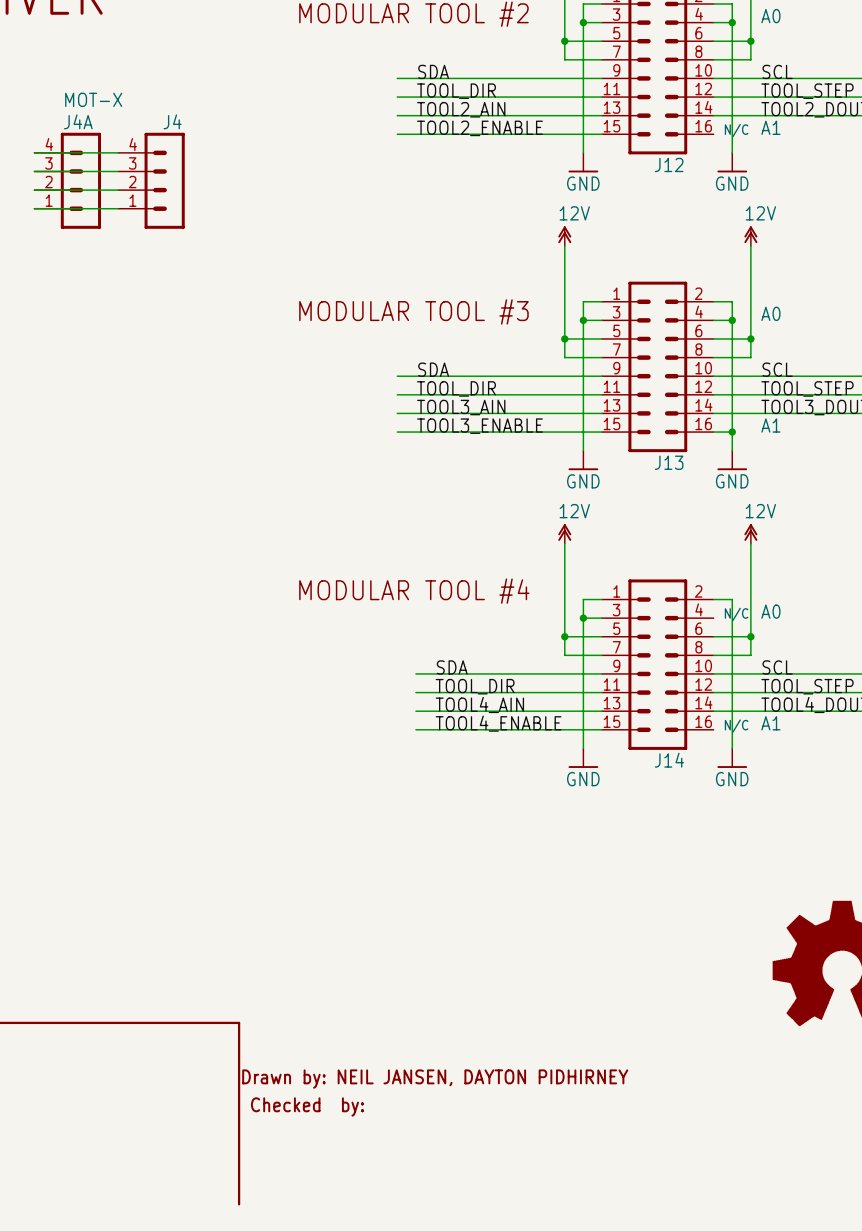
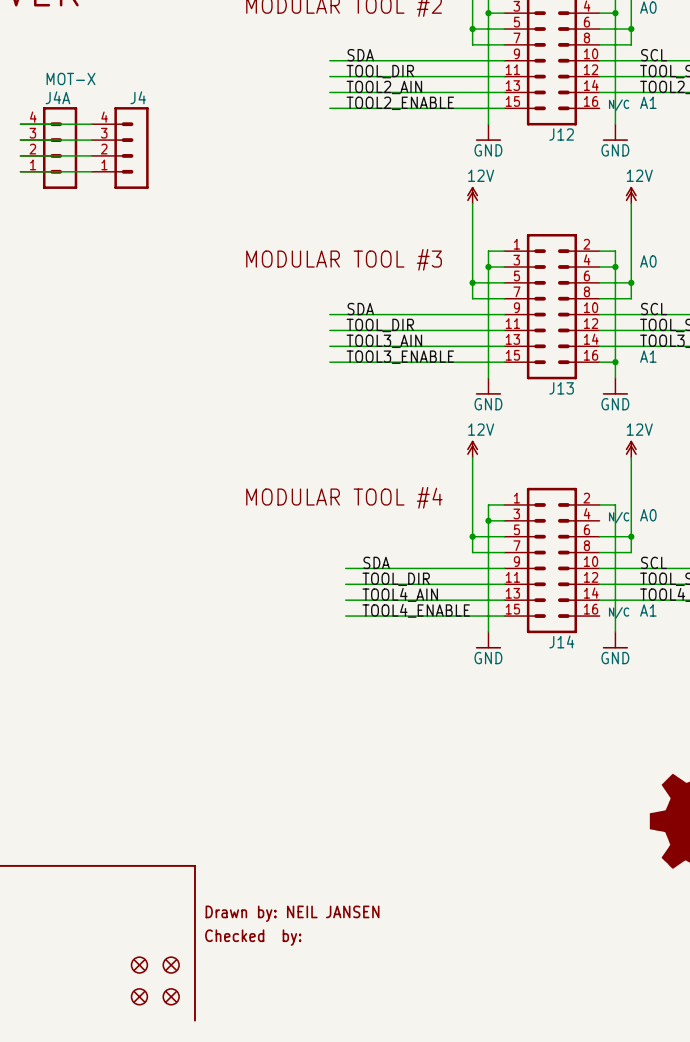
text: Drawn by: NEIL JANSEN, DAYTON PIDHIRNEY (435, 1079) -> Drawn by: NEIL JANSEN (292, 913)
part: none -> (139, 965)
part: none -> (171, 965)
part: none -> (139, 996)
part: none -> (171, 996)

